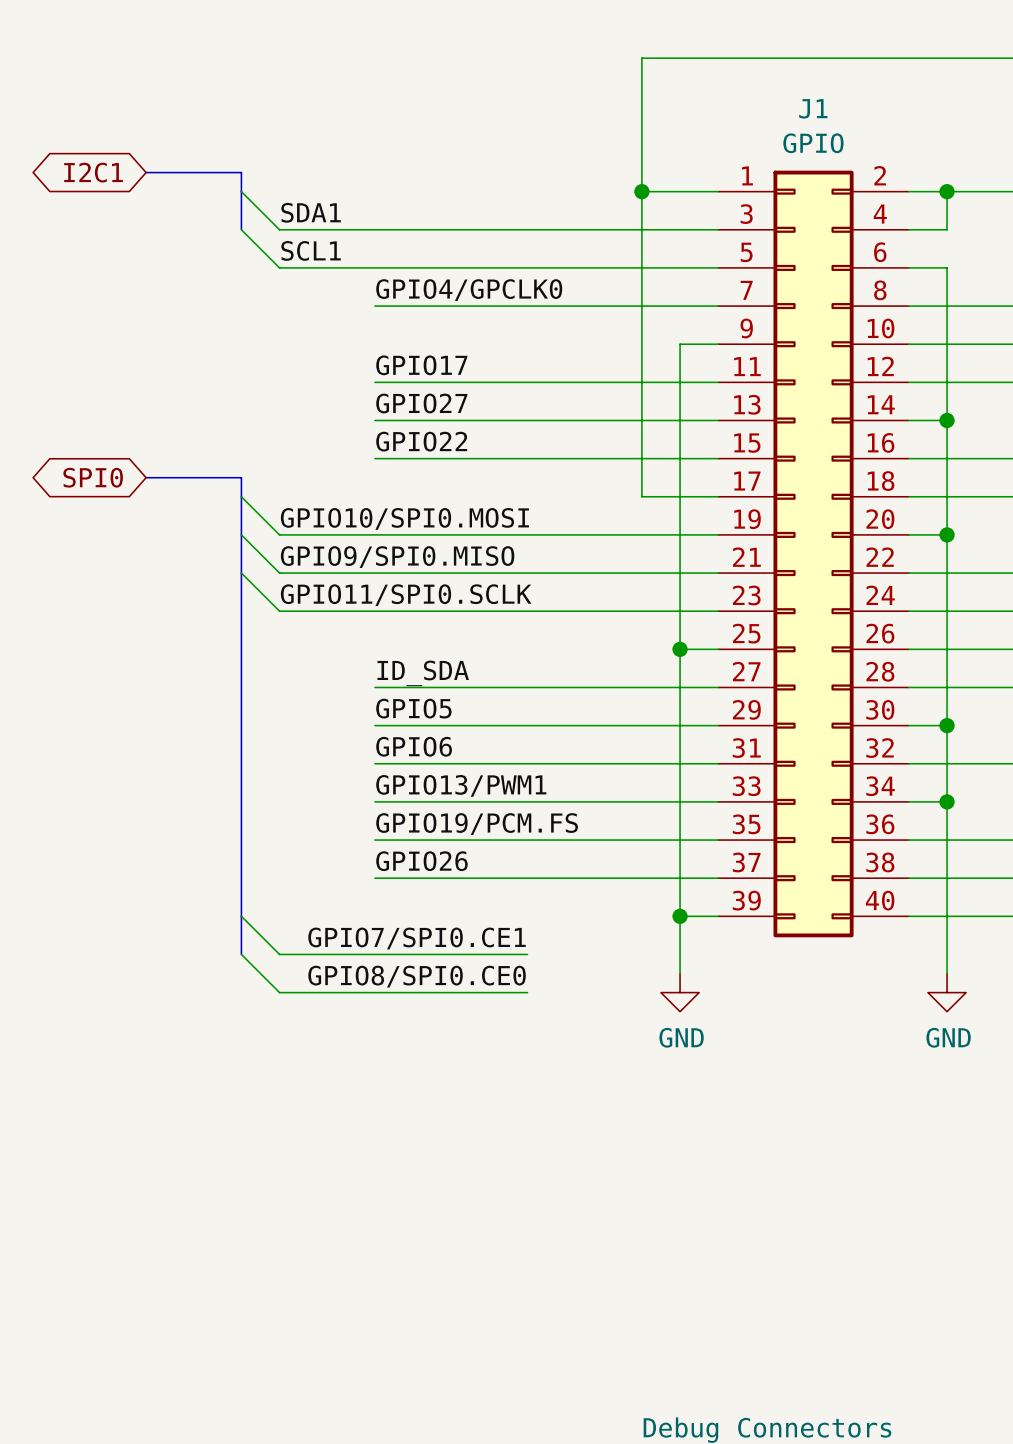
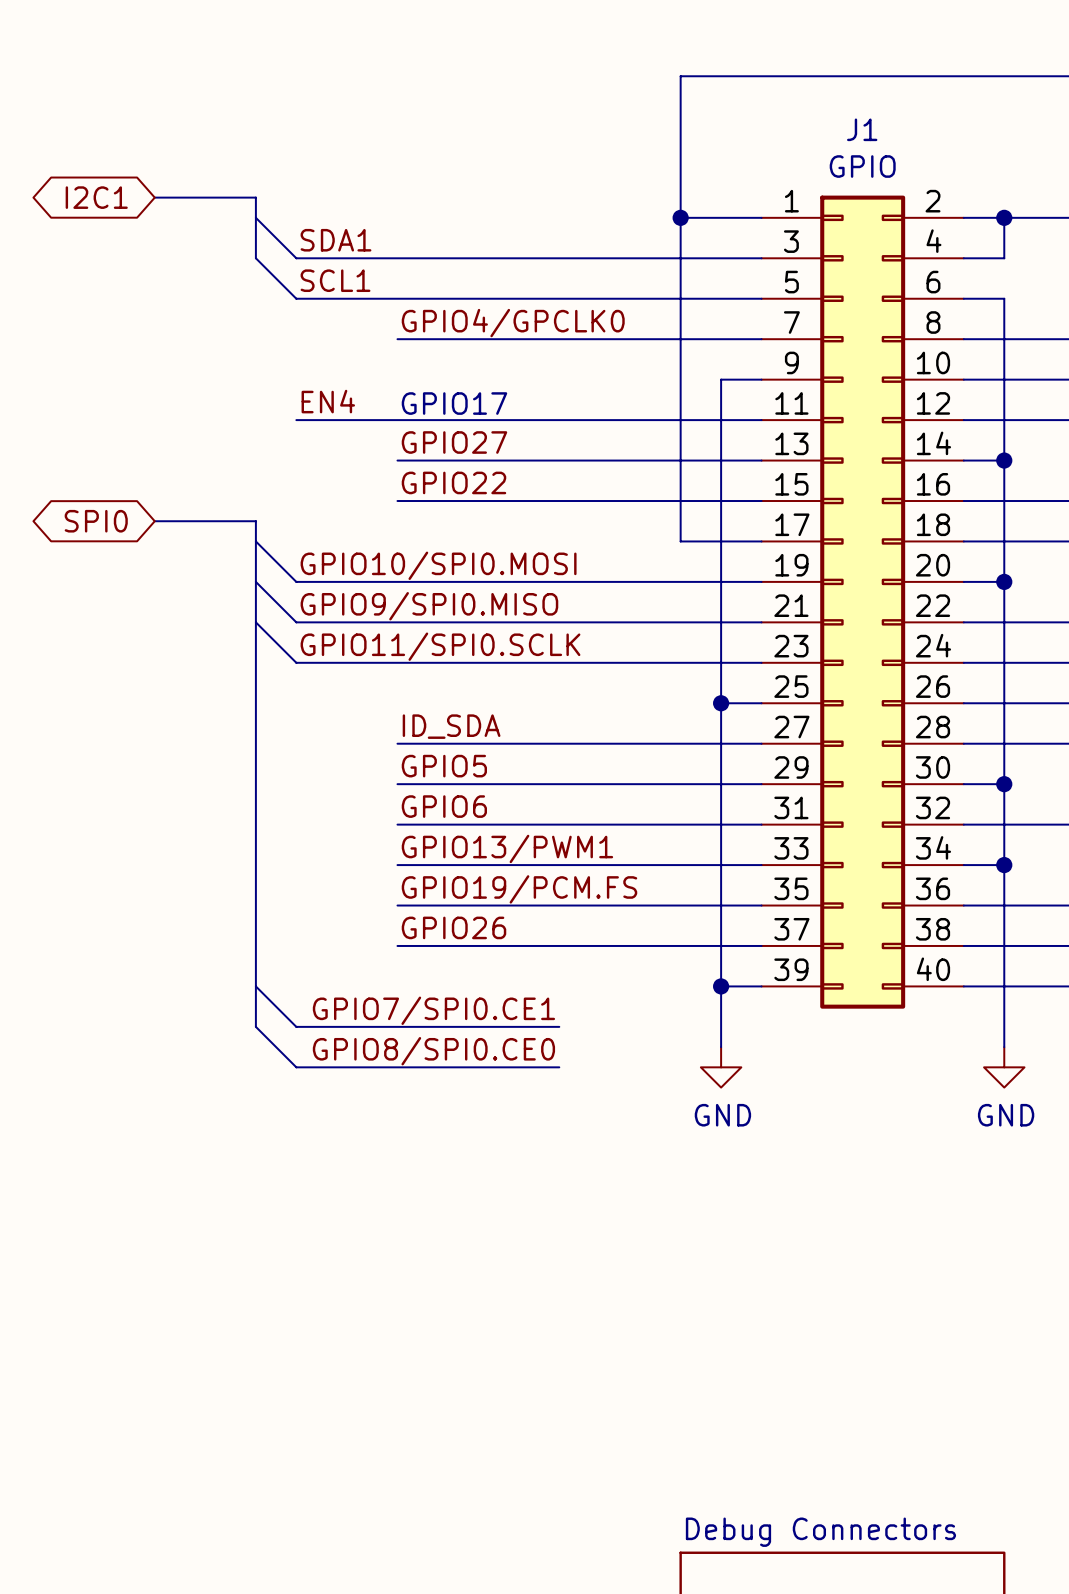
label: none -> EN4 (328, 401)
label: GPIO17 (421, 365) -> none
text: none -> GPIO17 (454, 403)
wire: none -> (296, 420) (397, 420)

